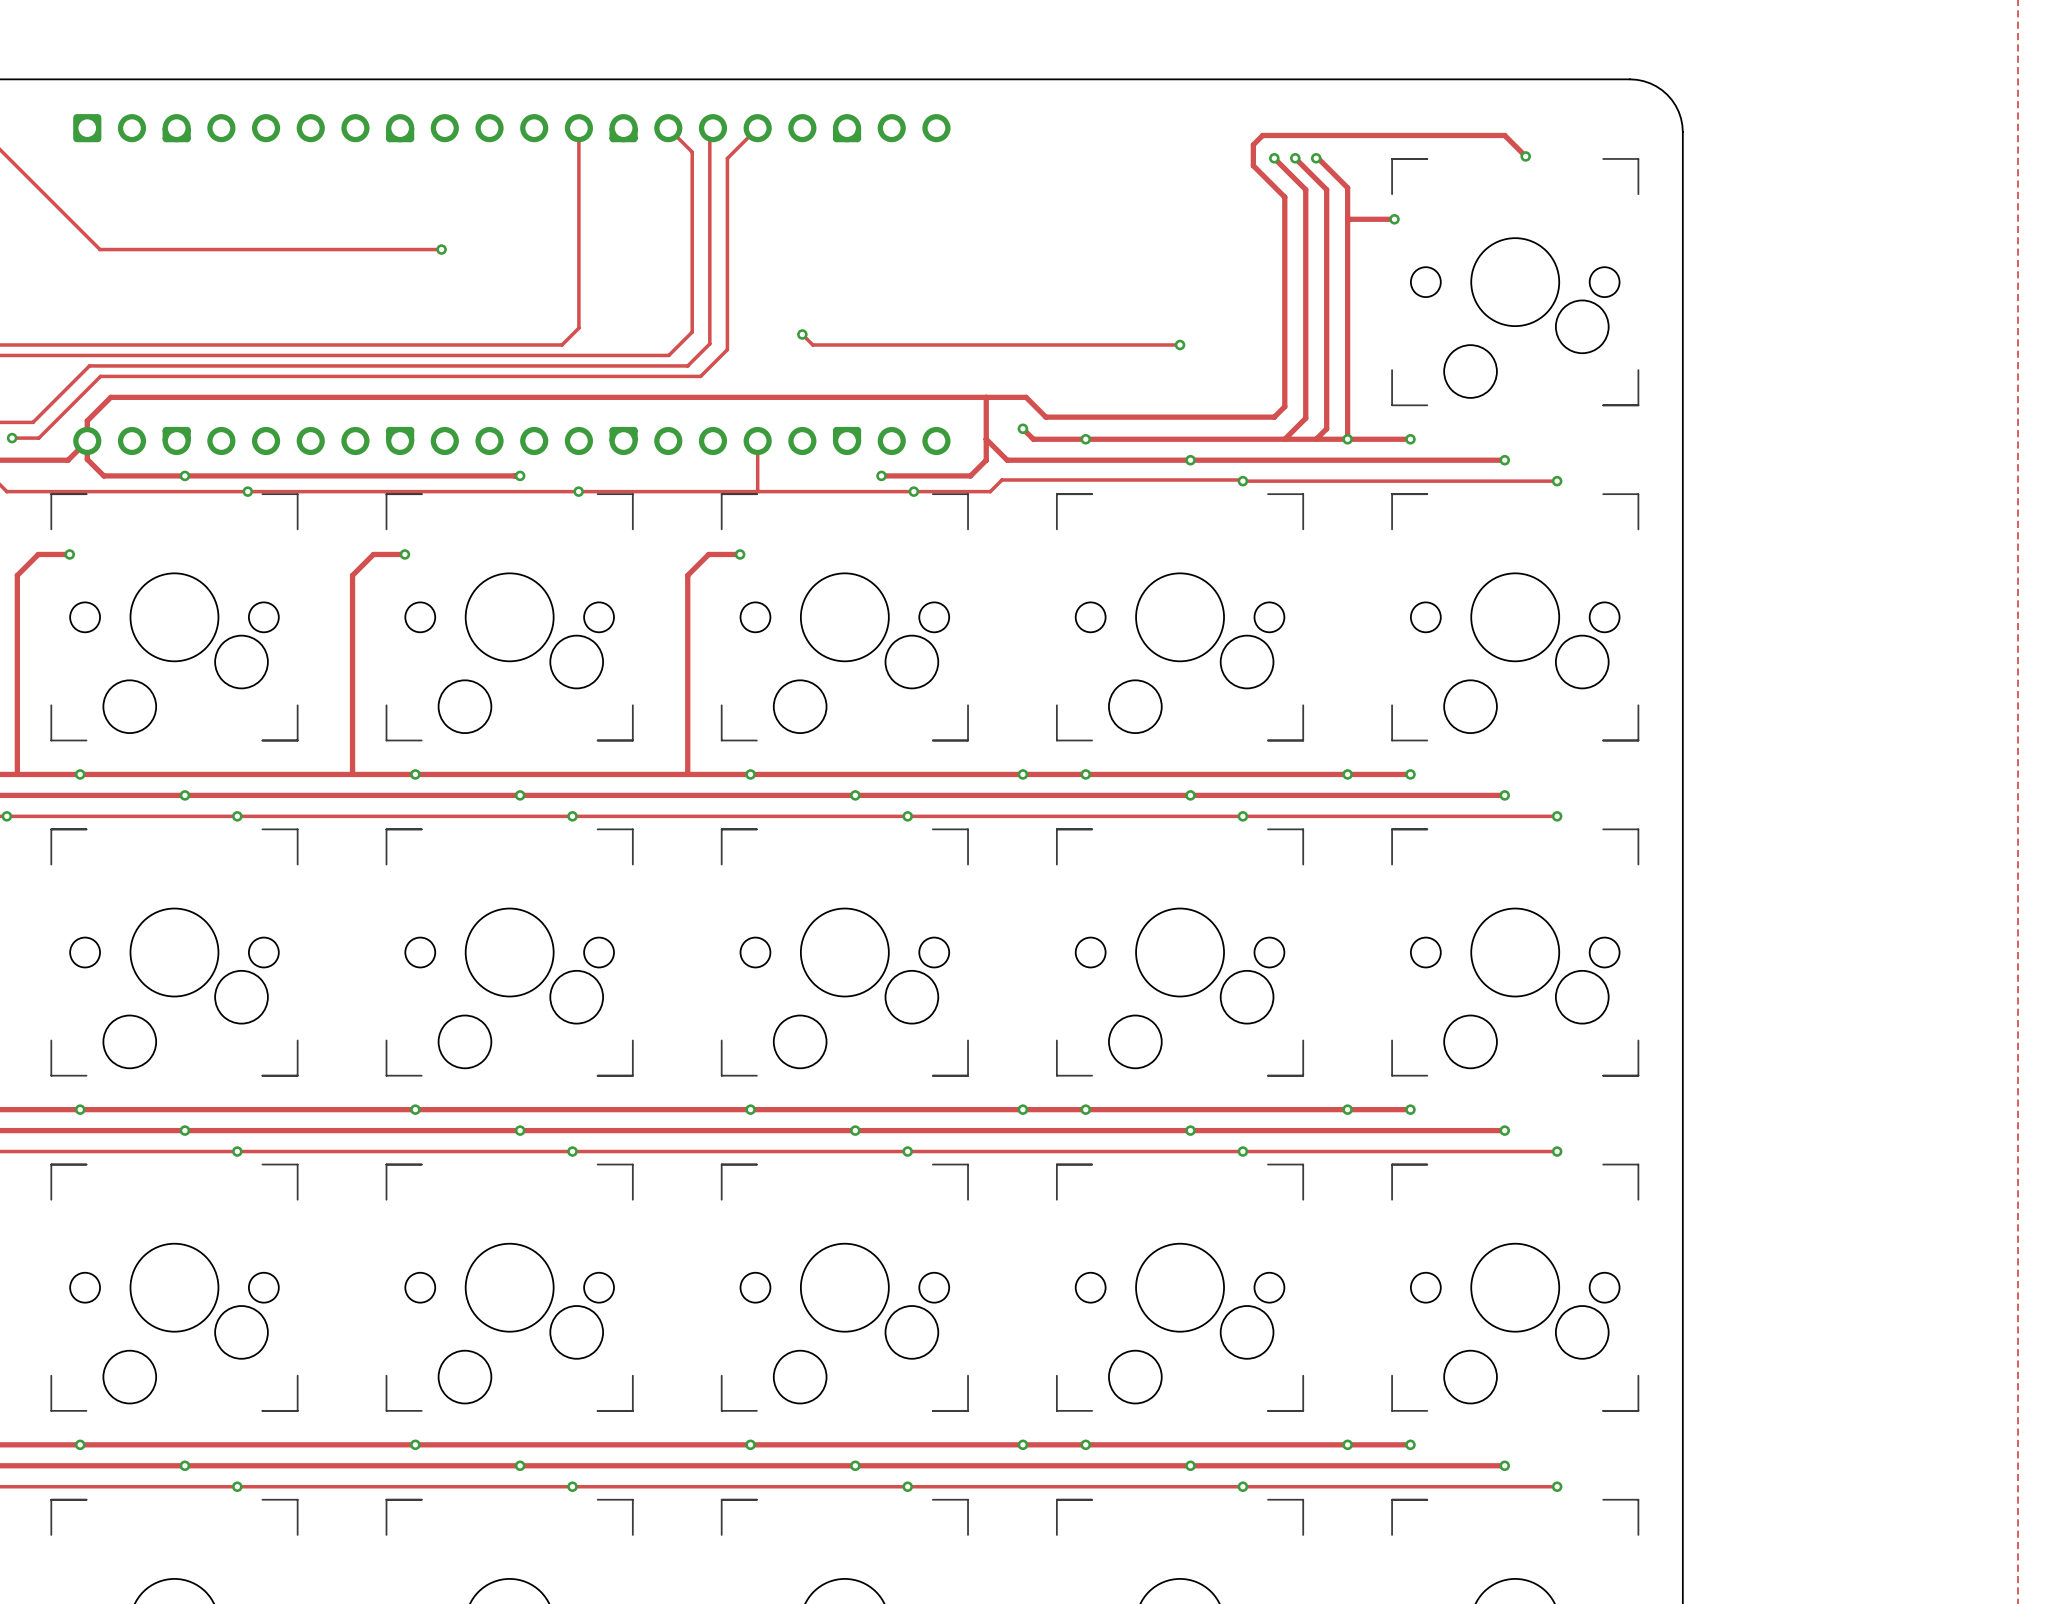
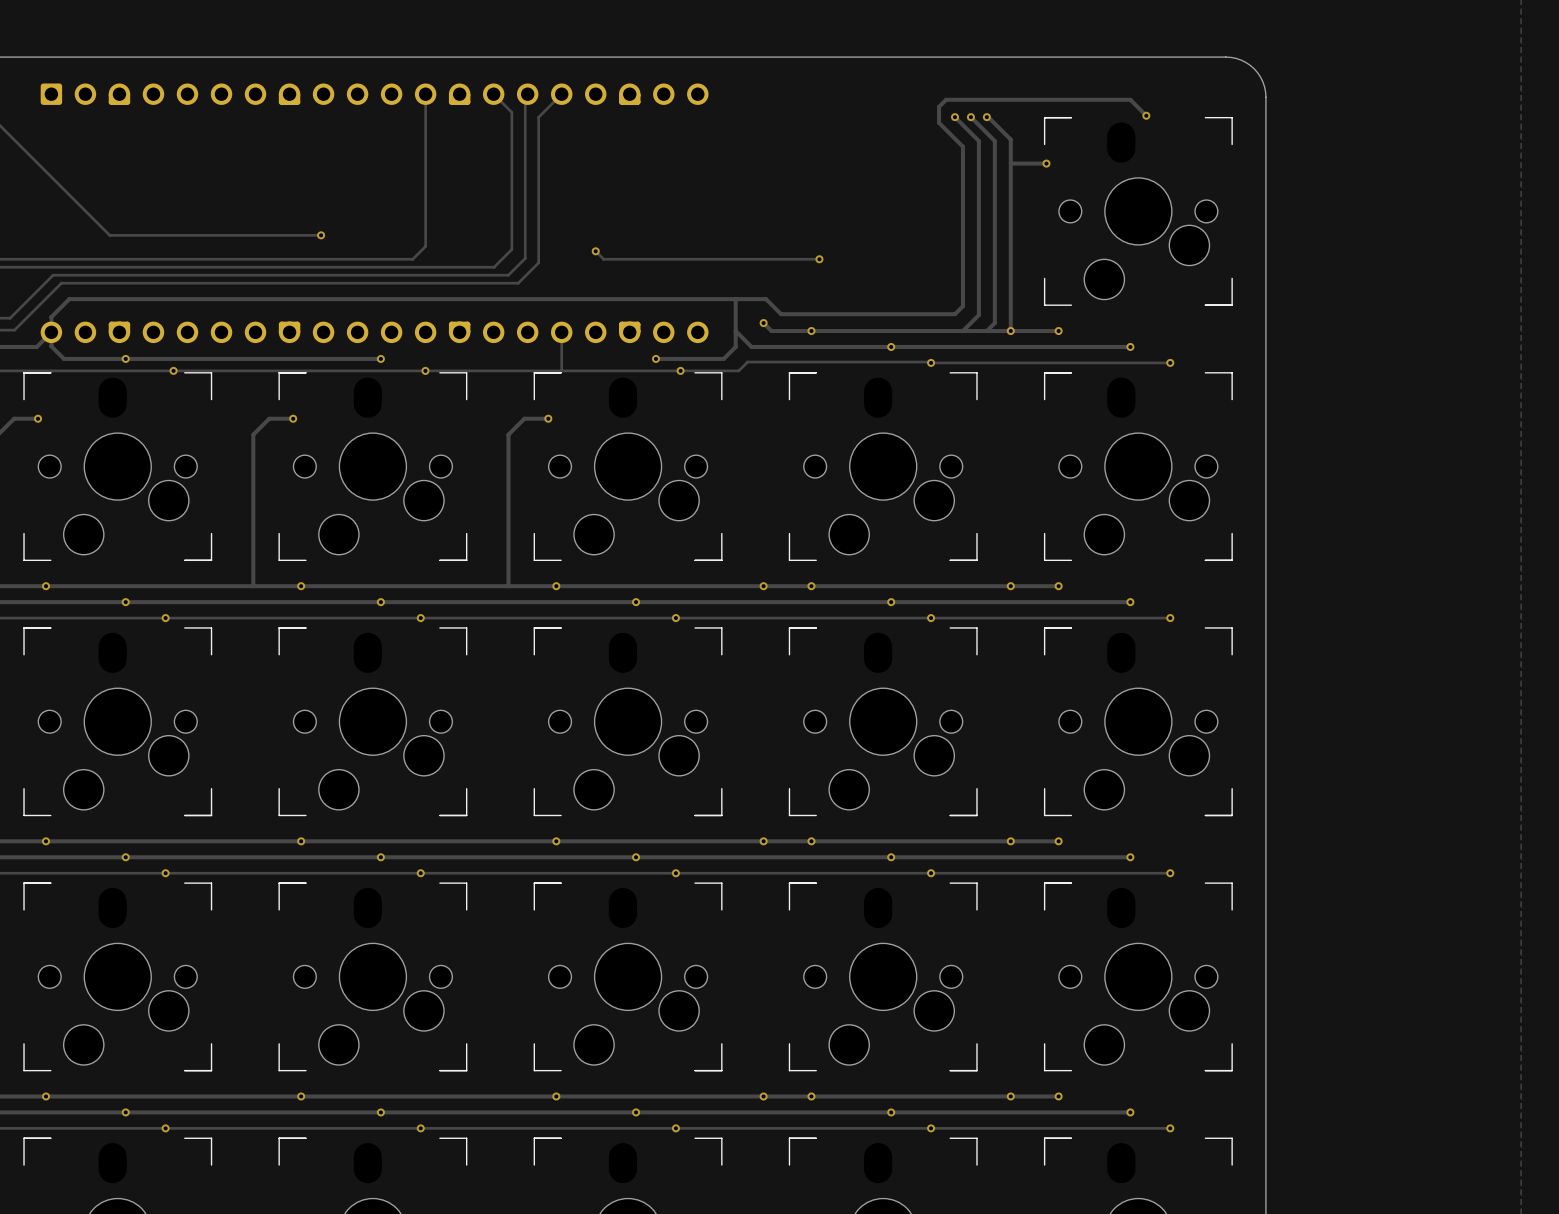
track: (99, 249) (441, 249) -> (61, 186) (109, 235) (321, 235)
via position: (441, 249) -> (321, 235)
track: (1096, 344) (1180, 344) -> none
via position: (1180, 344) -> (819, 259)

